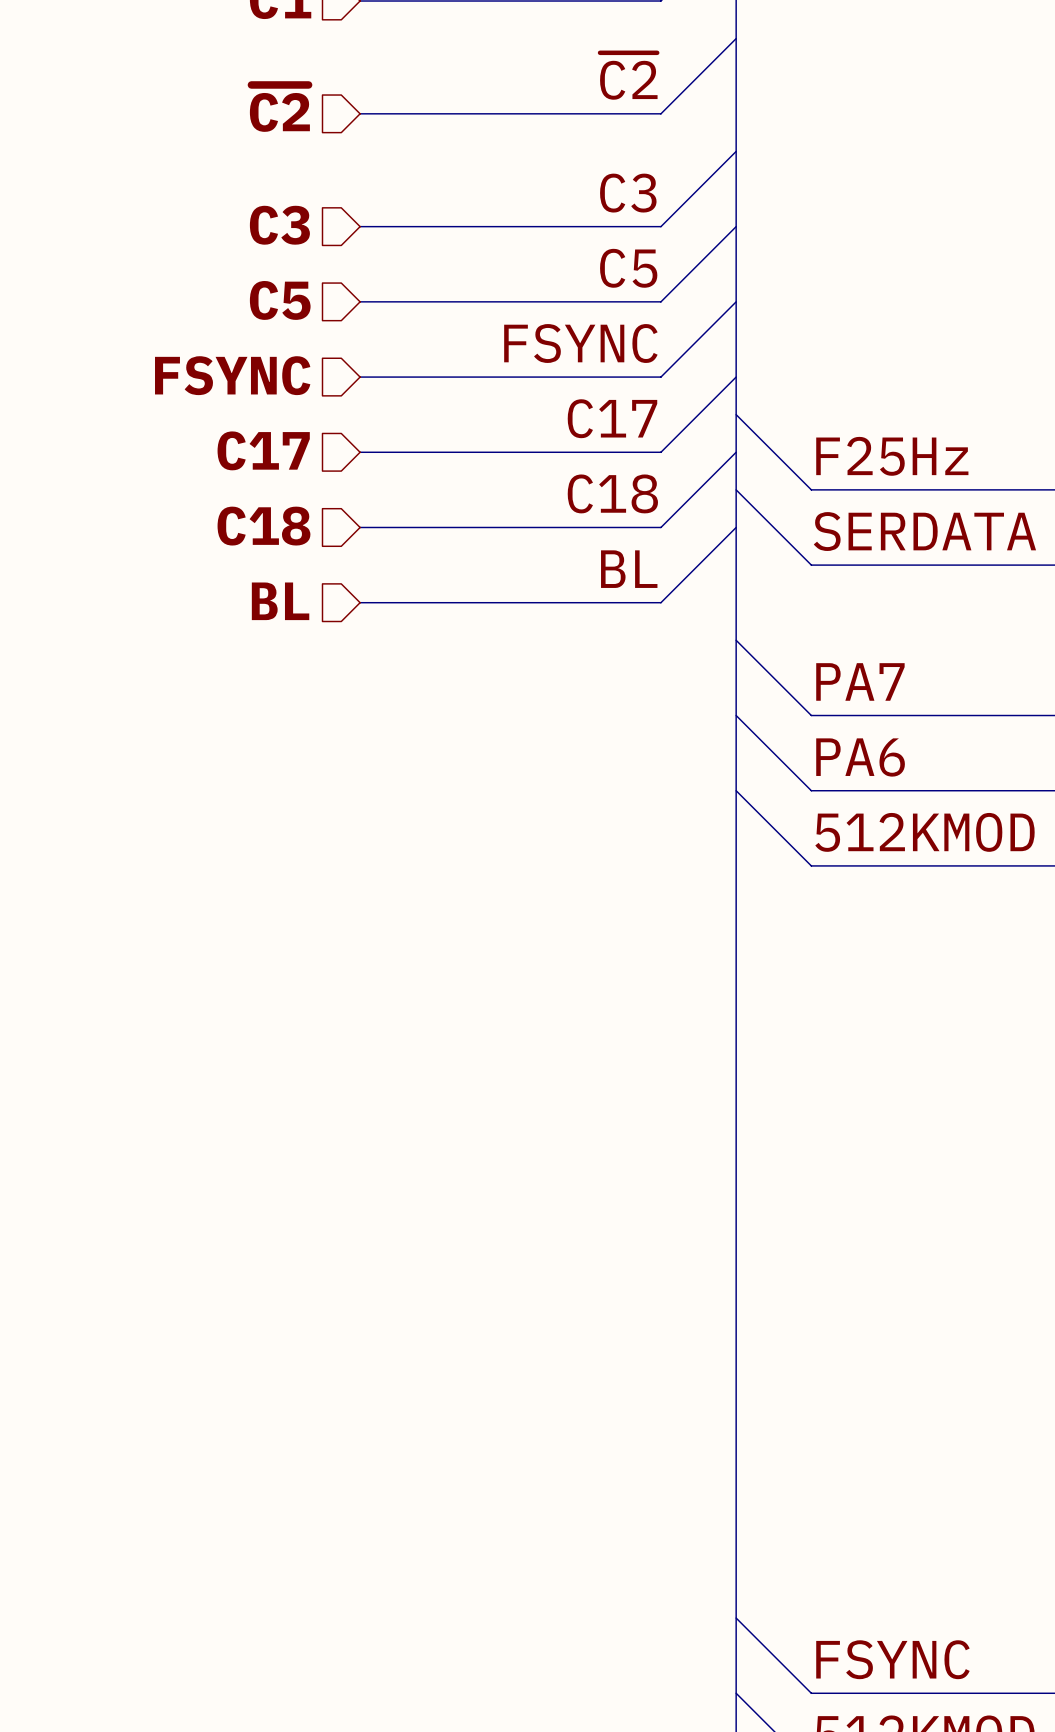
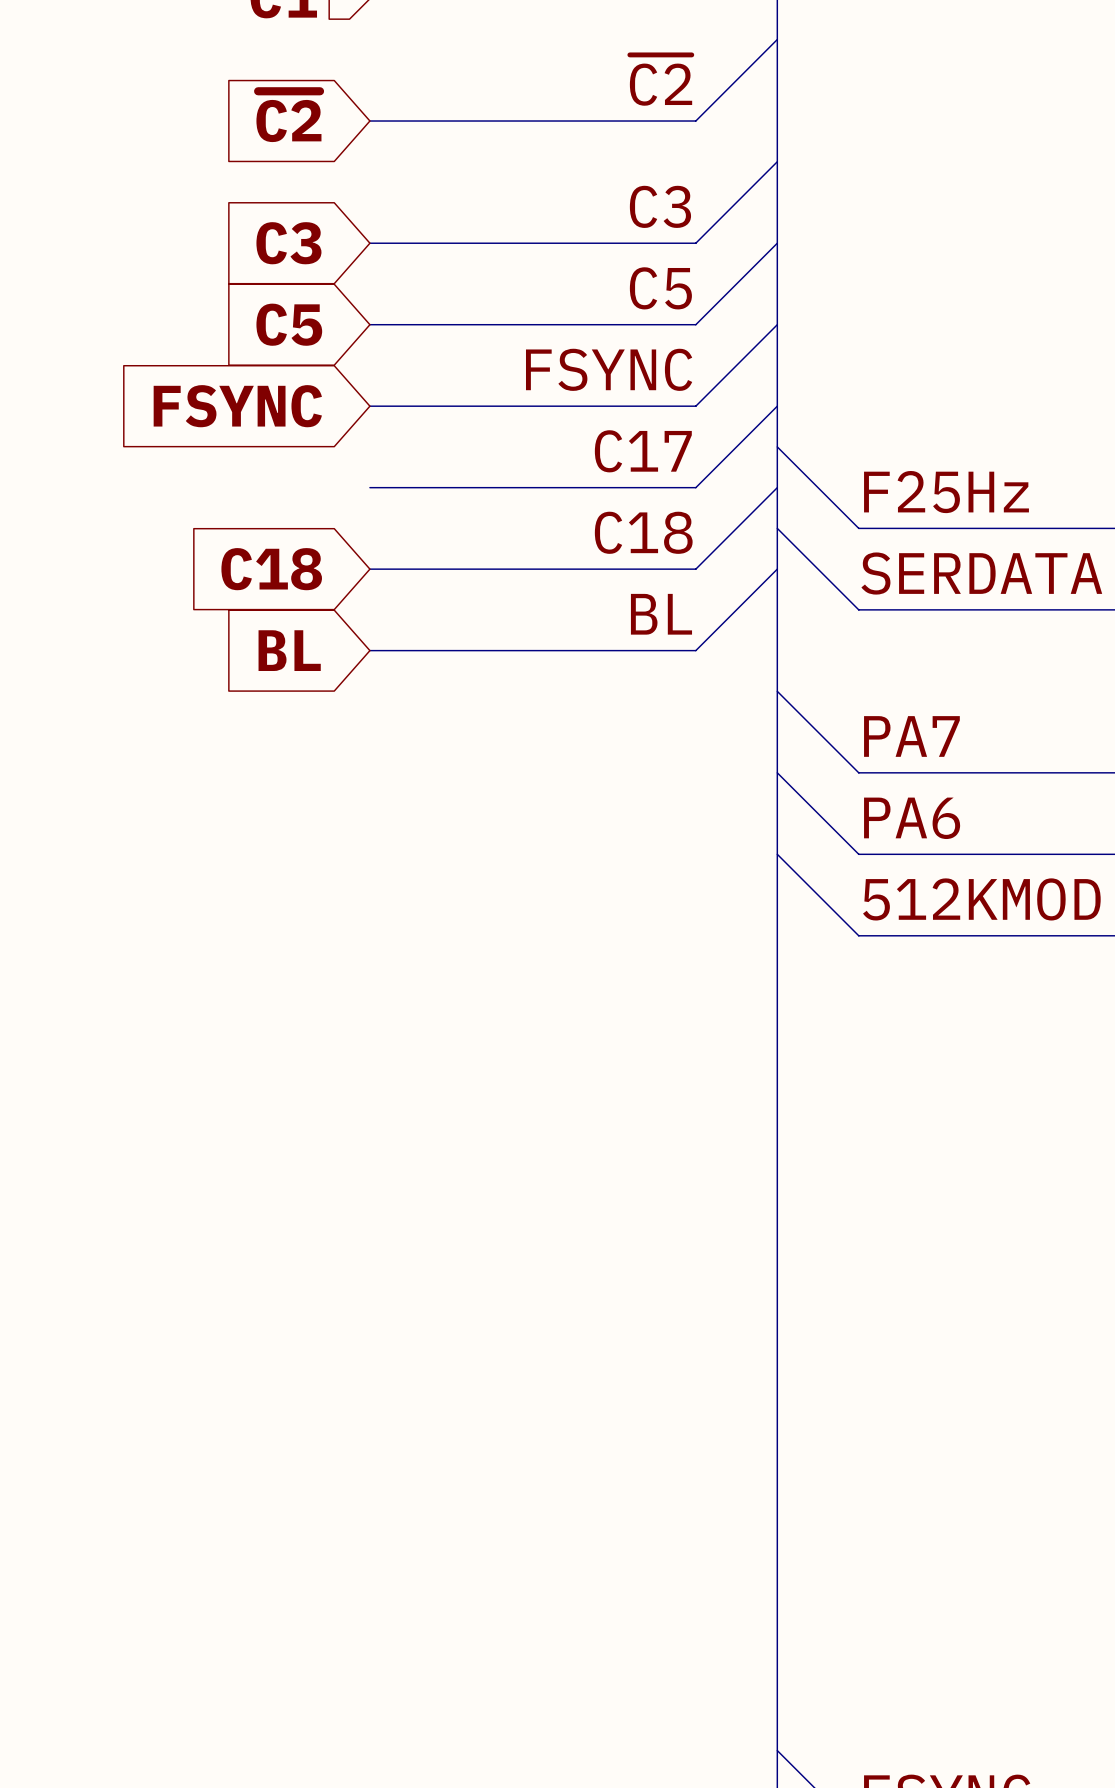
hierarchical label: ~{C2} (279, 108) -> none
global label: none -> ~{C2} (288, 116)
hierarchical label: C3 (279, 225) -> none
global label: none -> C3 (288, 243)
hierarchical label: C5 (280, 300) -> none
global label: none -> C5 (289, 324)
hierarchical label: FSYNC (232, 375) -> none
global label: none -> FSYNC (237, 406)
hierarchical label: C17 (263, 450) -> none
hierarchical label: C18 (263, 526) -> none
global label: none -> C18 (271, 569)
hierarchical label: BL (280, 601) -> none
global label: none -> BL (289, 650)

